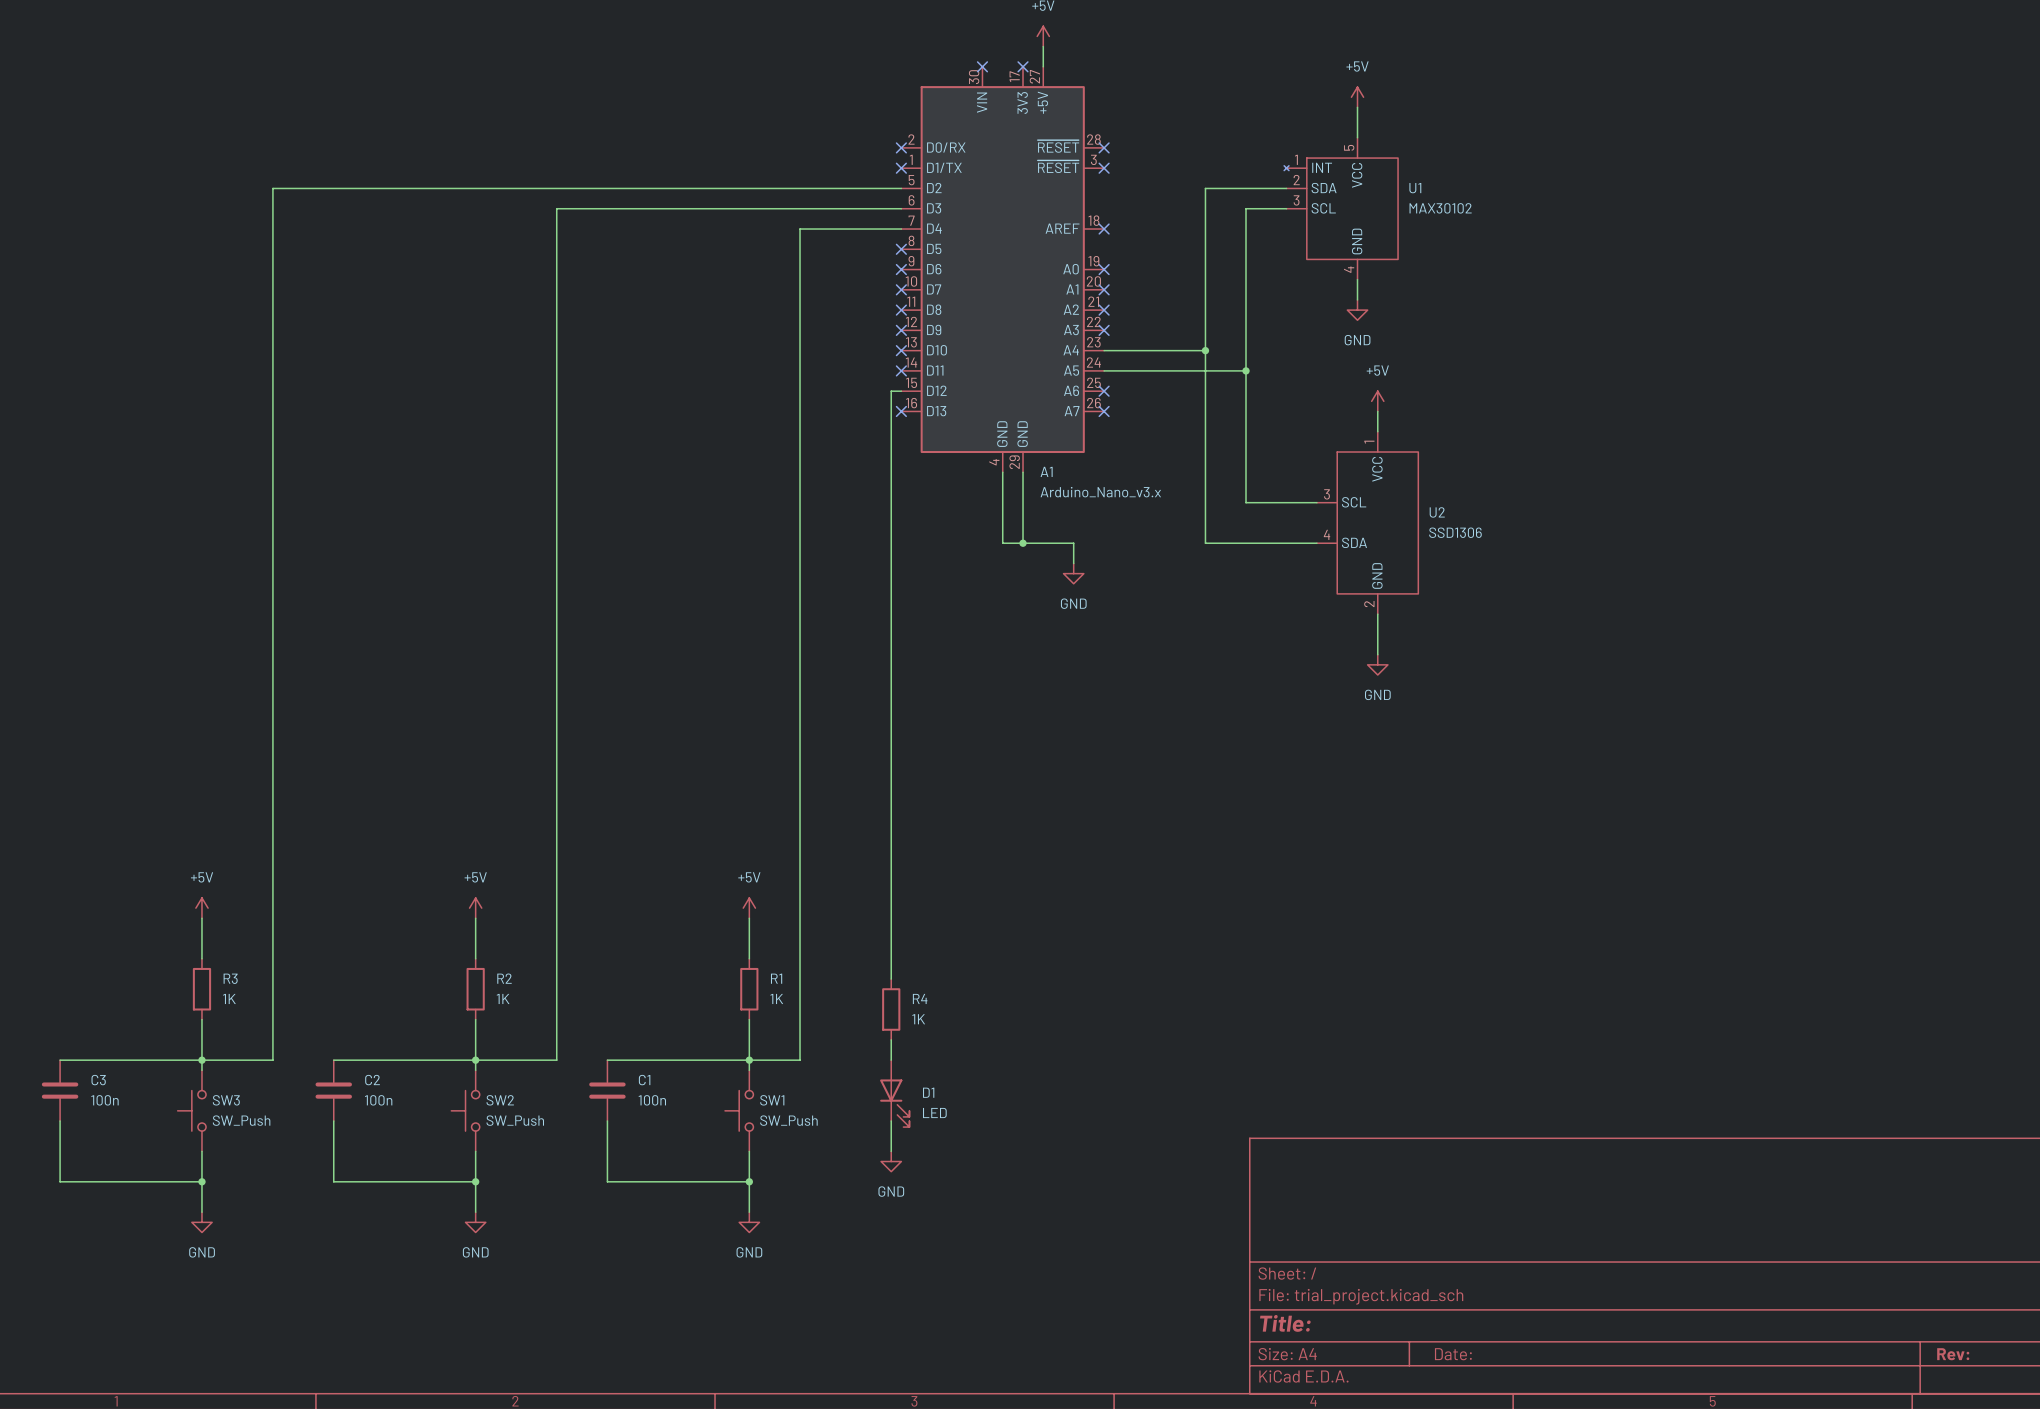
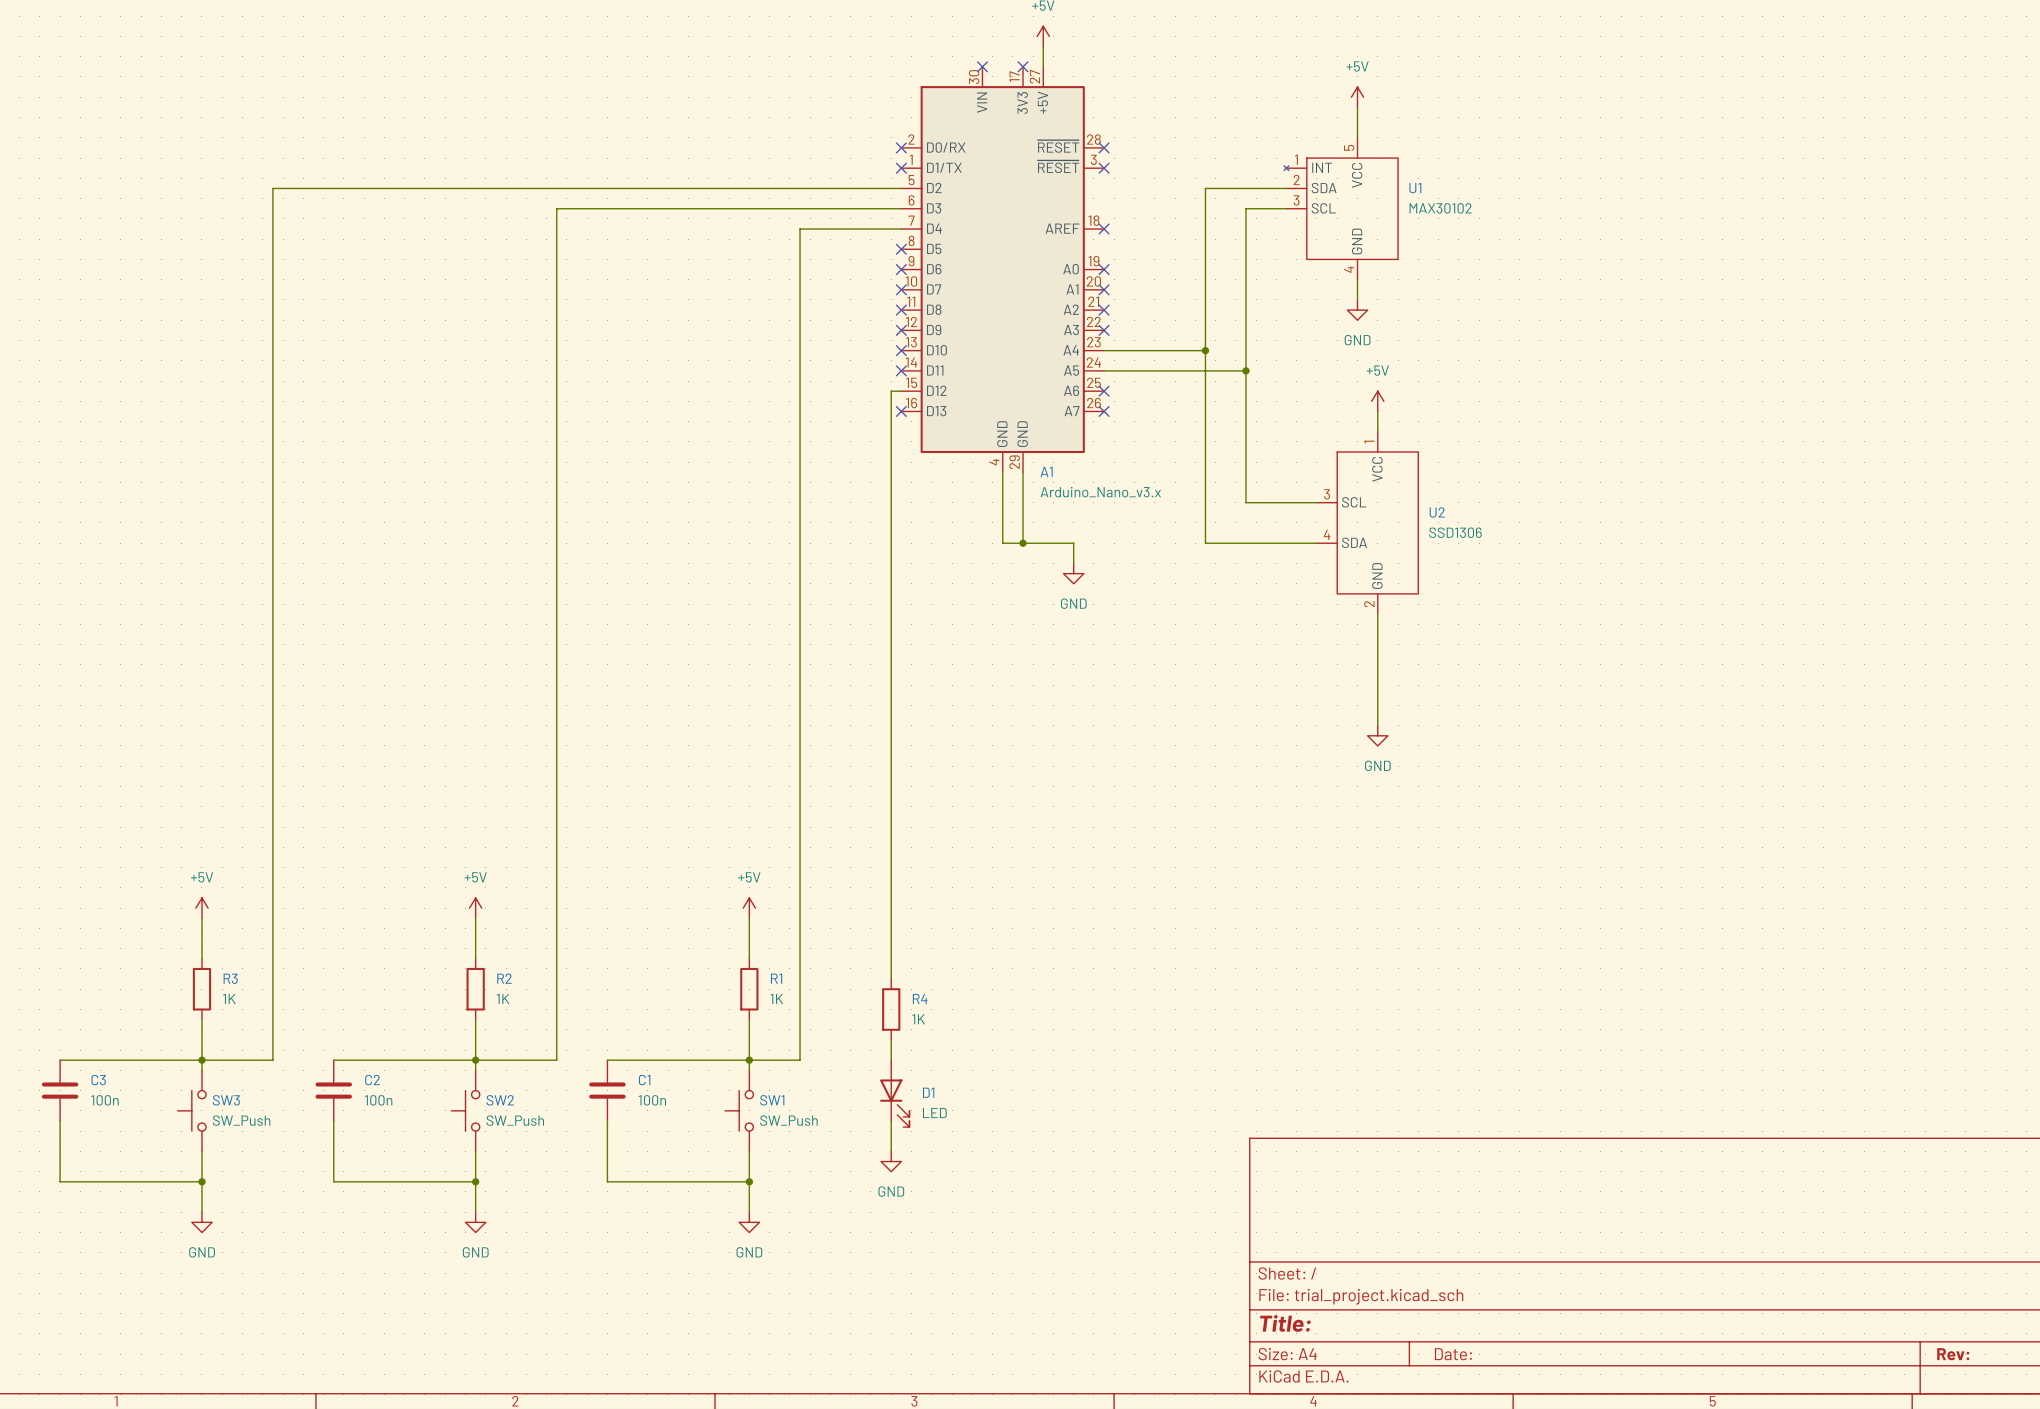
wire: none -> (1377, 654) (1377, 725)
power symbol position: GND (1377, 664) -> GND (1377, 735)

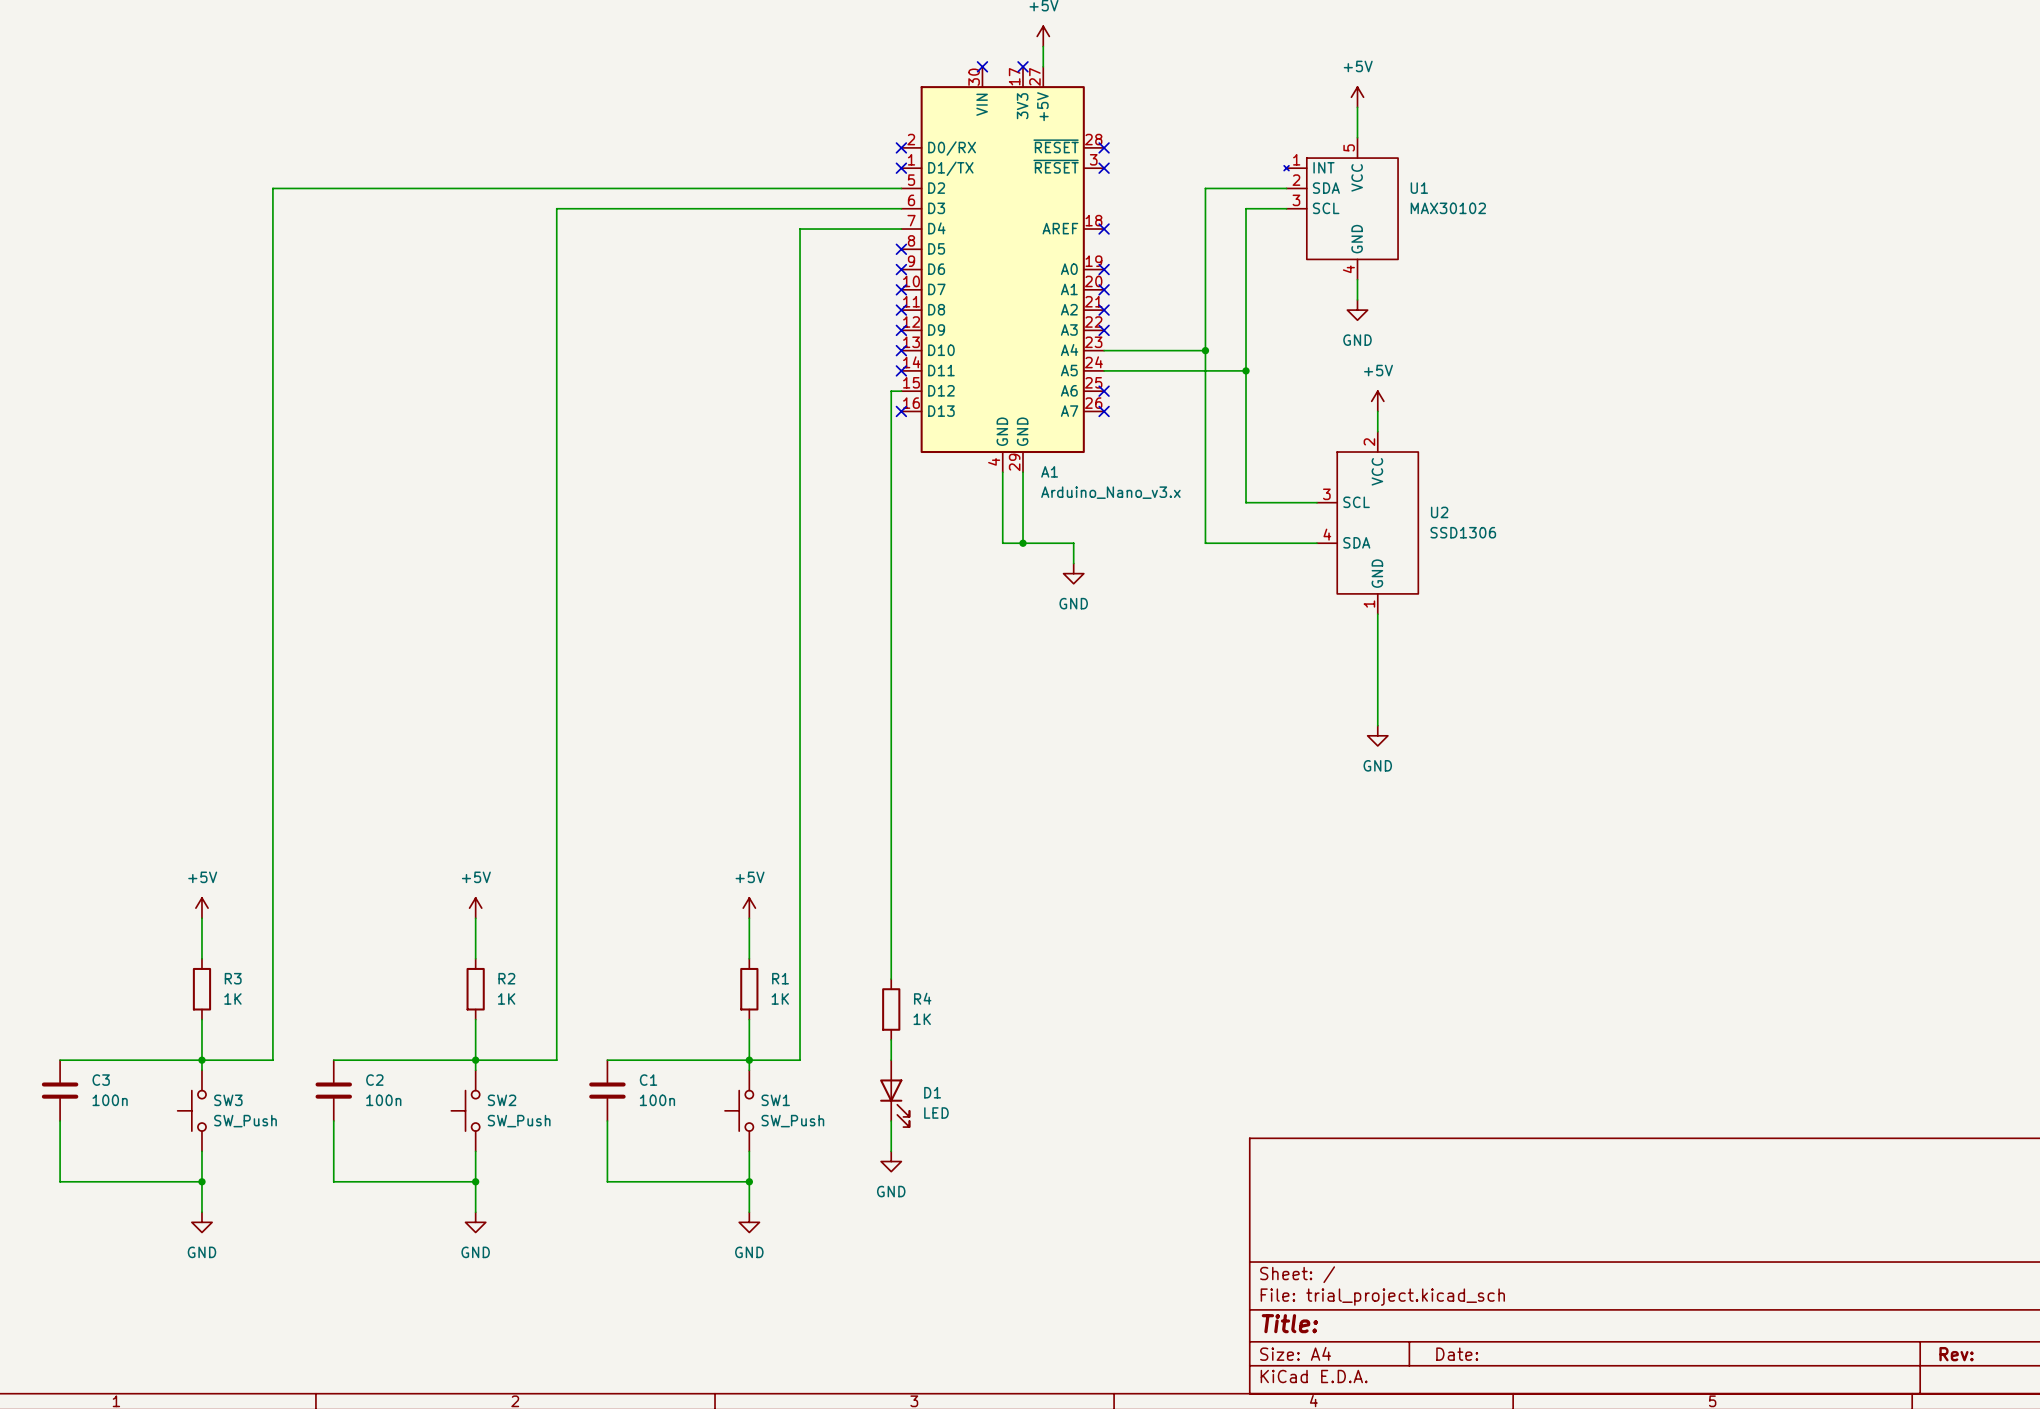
U2 pin number: 1 (1369, 442) -> 2 (1369, 442)
U2 pin number: 2 (1369, 604) -> 1 (1369, 604)

